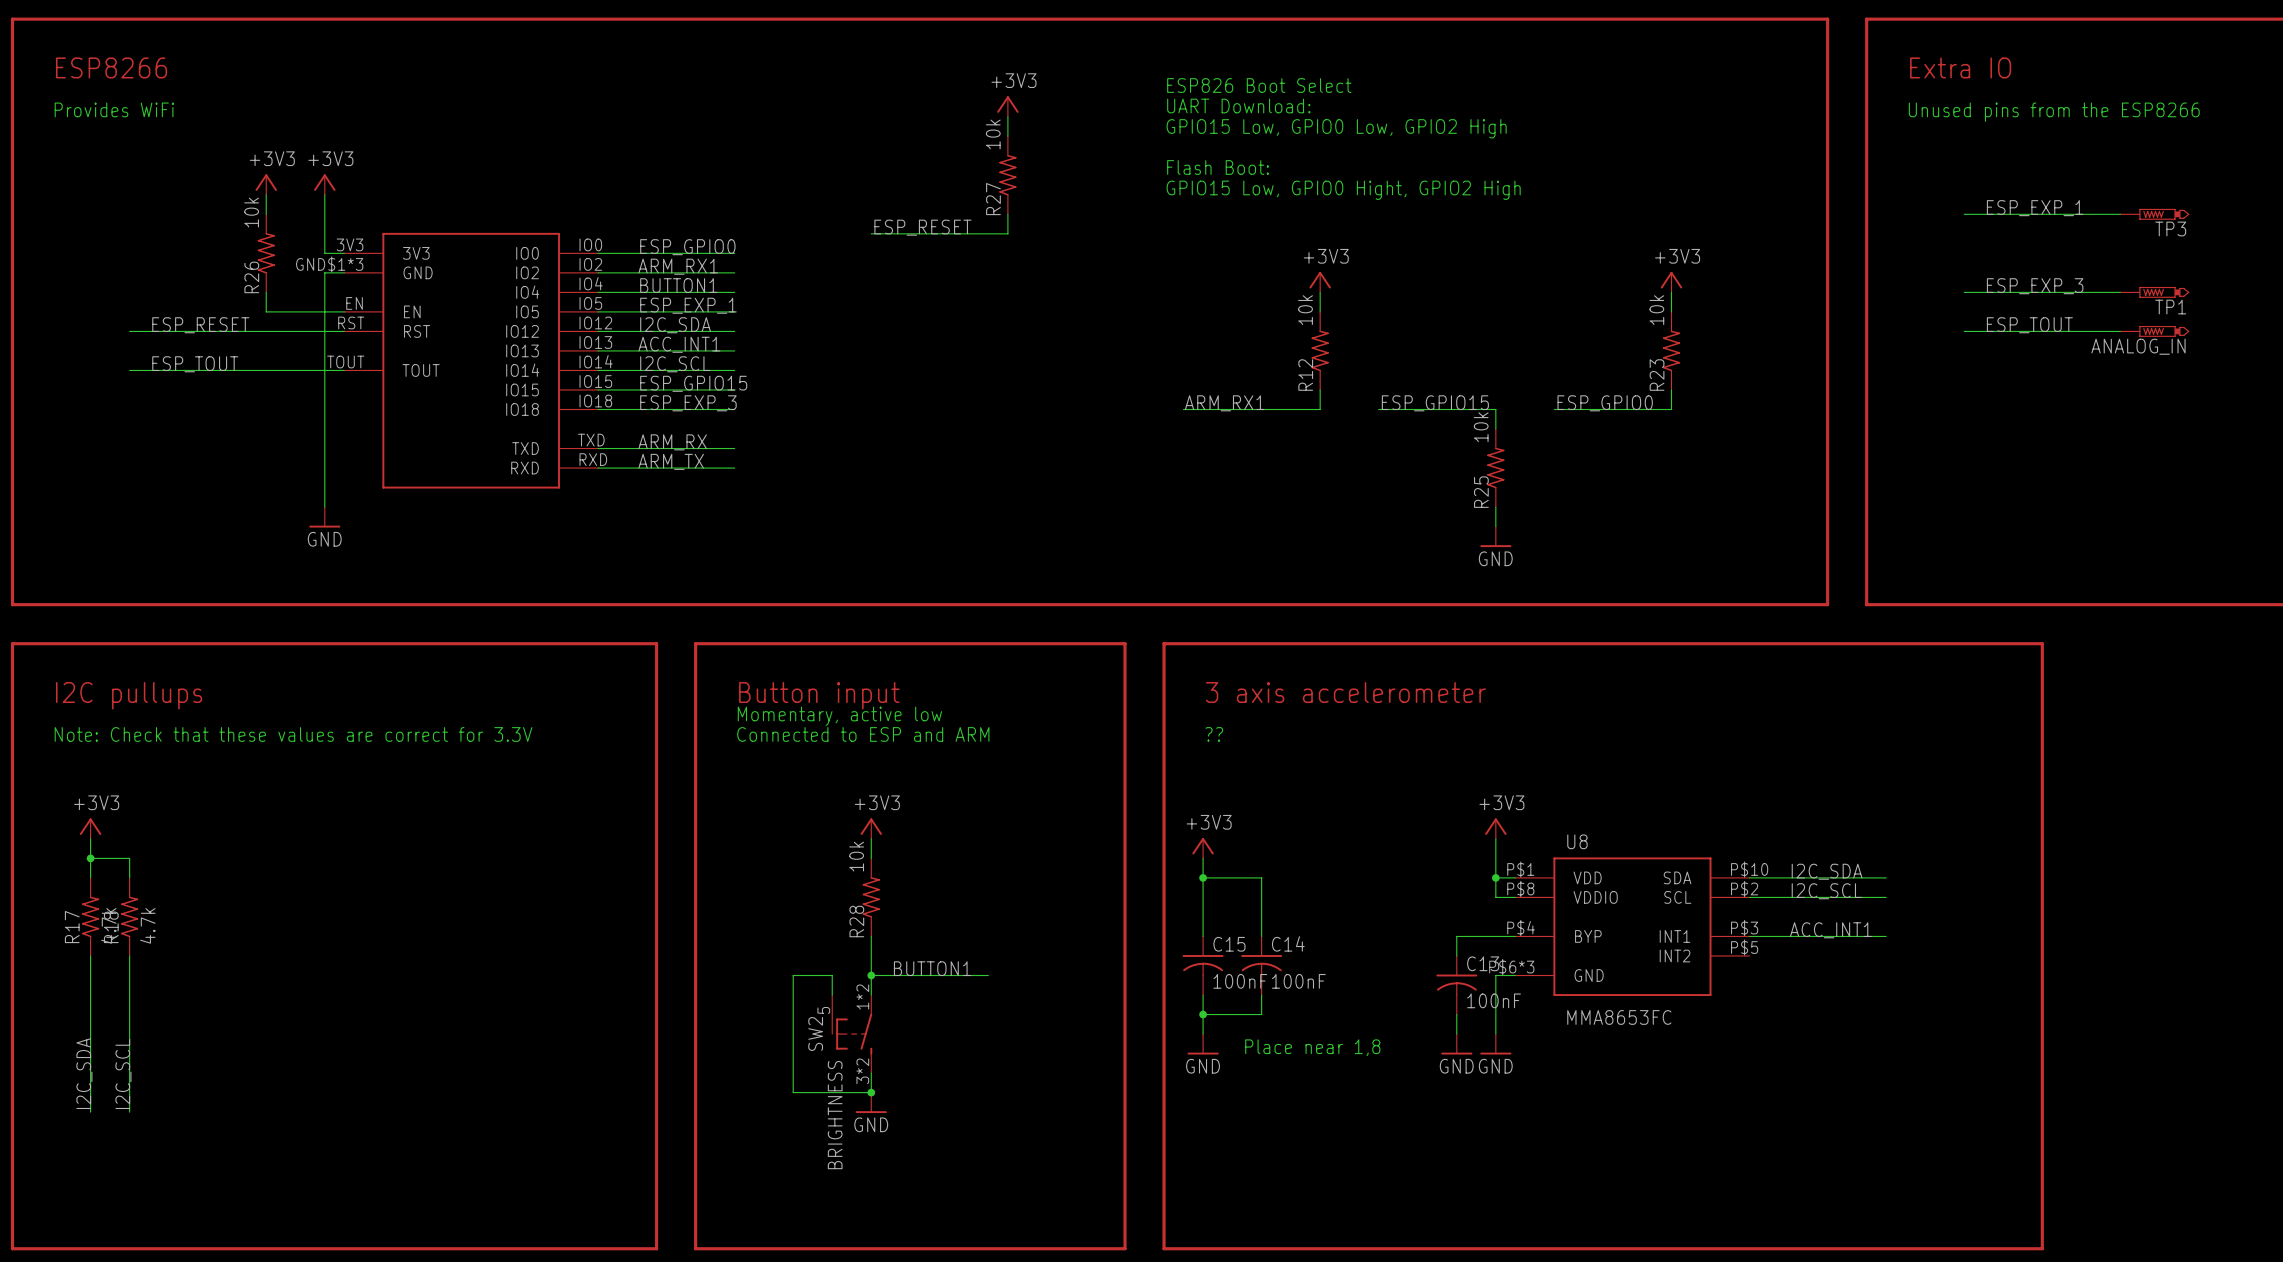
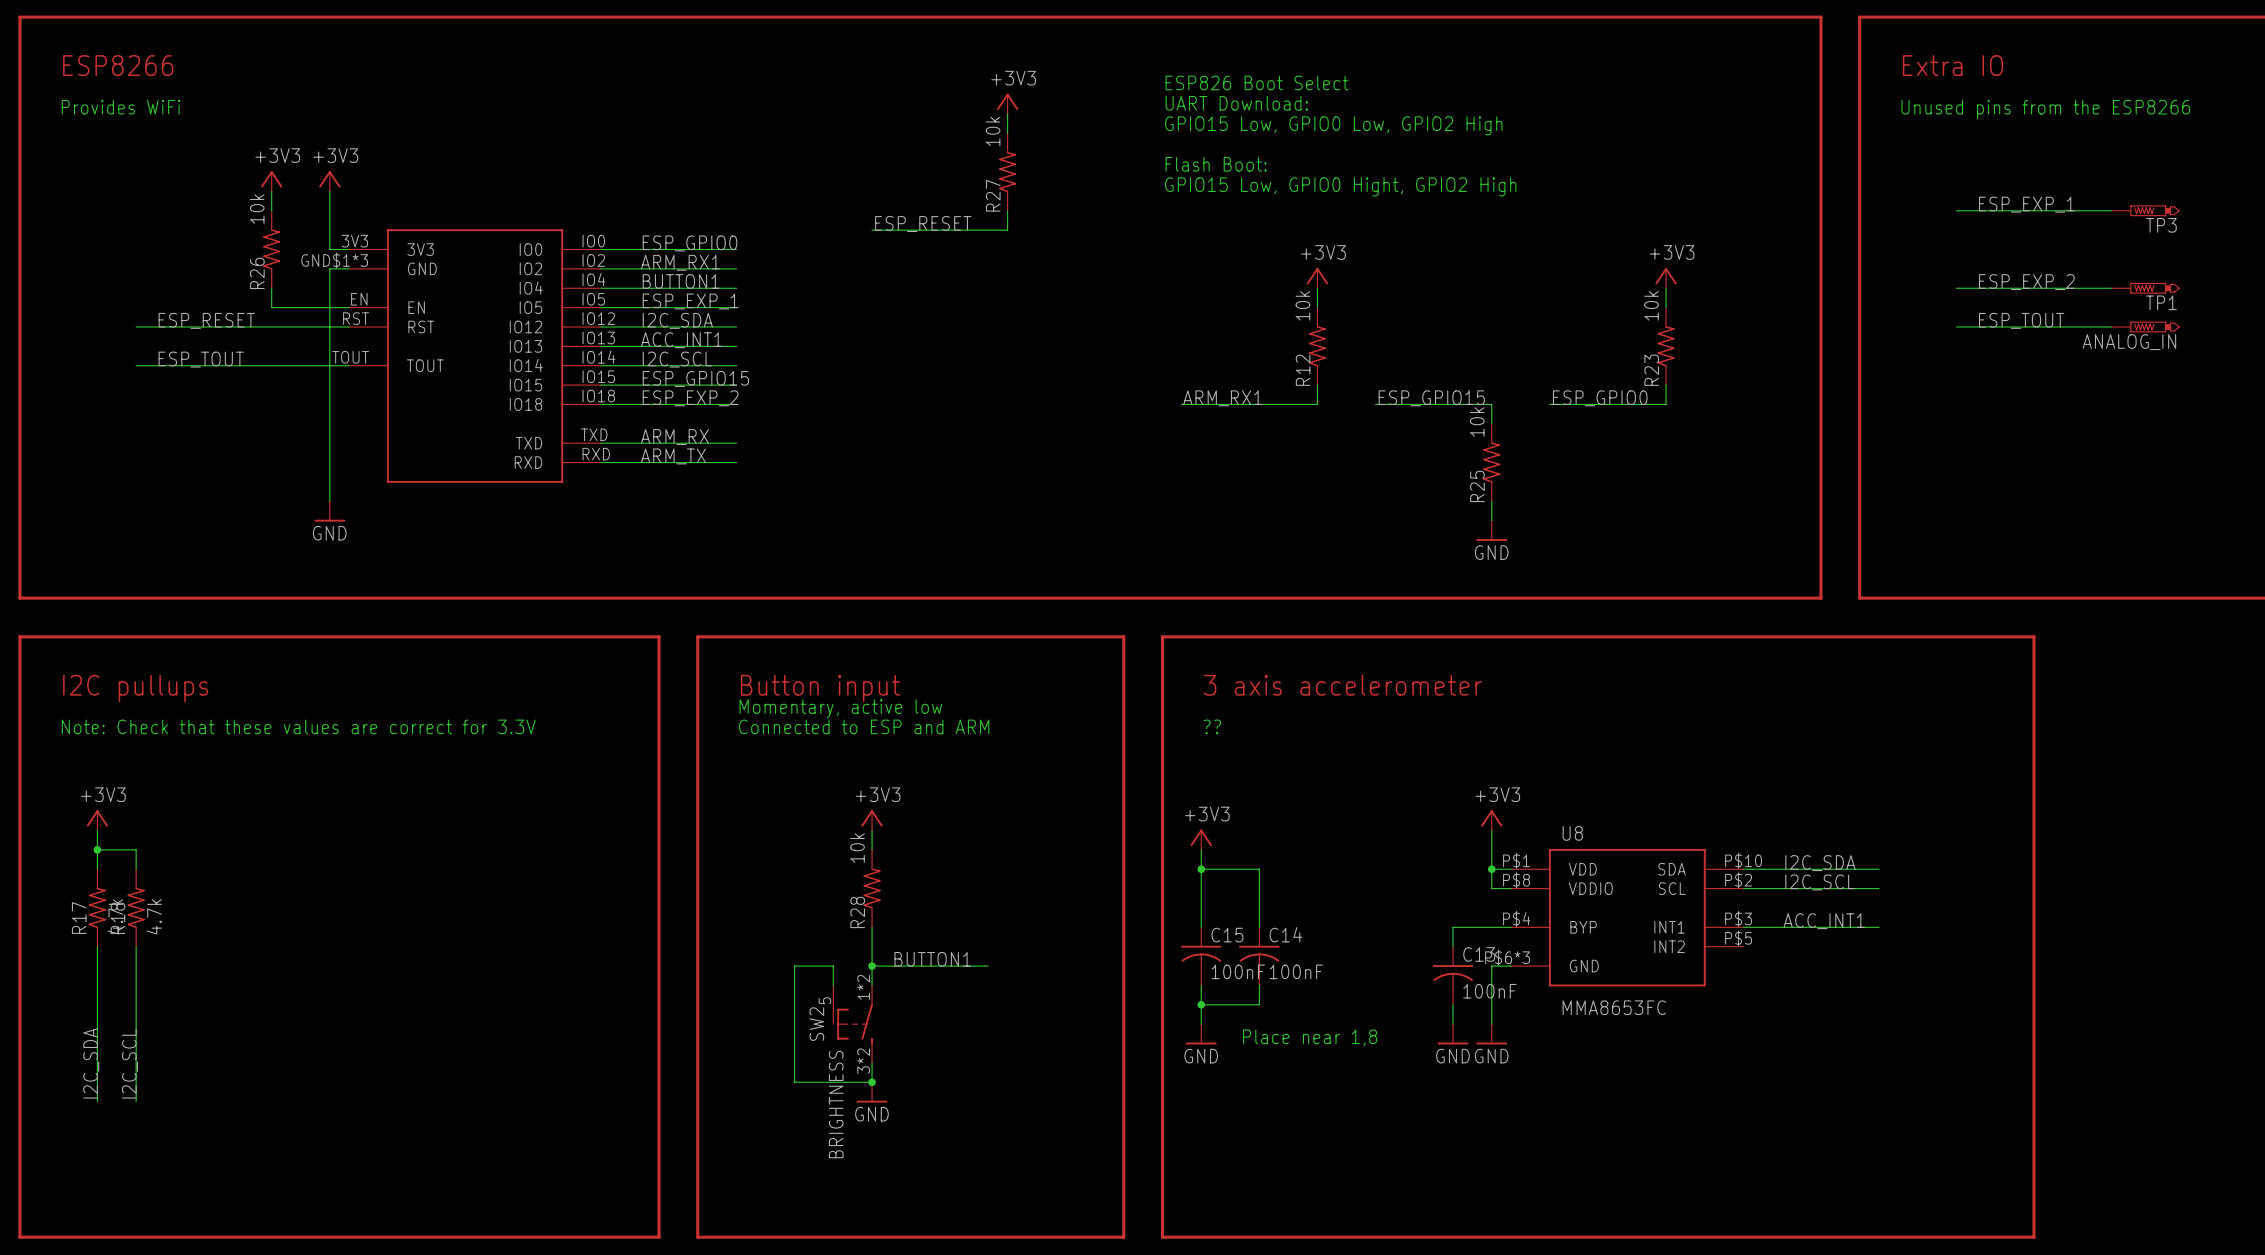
label: ESP_EXP_3 (2035, 286) -> ESP_EXP_2 (2026, 282)
label: ESP_EXP_3 (688, 403) -> ESP_EXP_2 (690, 398)

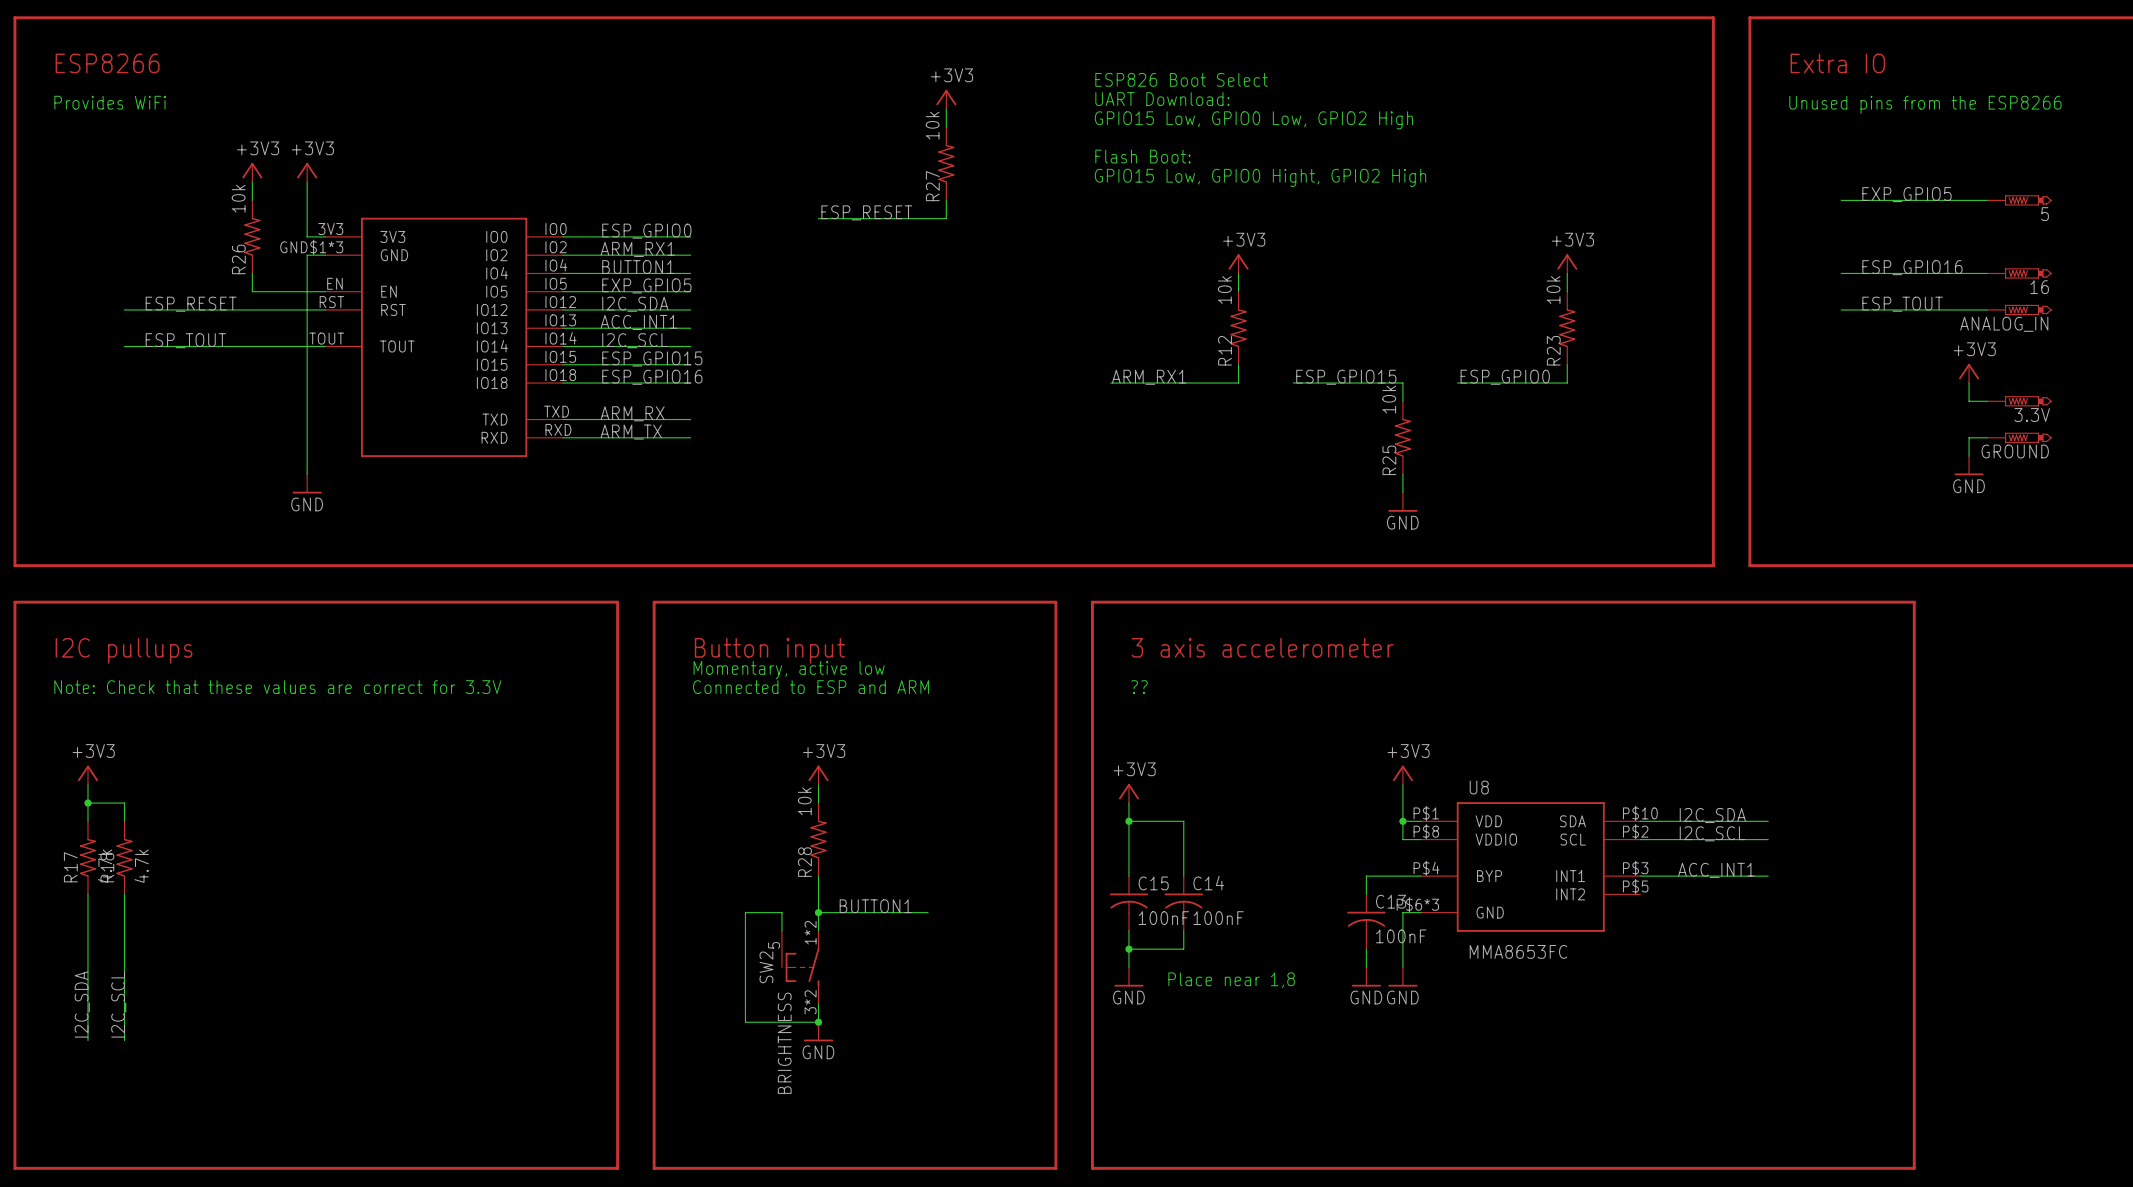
label: ESP_EXP_1 (2026, 204) -> EXP_GPIO5 (1906, 194)
TP3 name: TP3 (2161, 225) -> 5 (2045, 214)
label: ESP_EXP_2 (2026, 282) -> ESP_GPIO16 (1912, 267)
label: ESP_EXP_1 (690, 301) -> EXP_GPIO5 (646, 285)
TP1 name: TP1 (2161, 302) -> 16 (2039, 287)
power symbol: none -> +3V3 (1969, 373)
label: ESP_EXP_2 (690, 398) -> ESP_GPIO16 (652, 377)
wire: none -> (1969, 383) (1969, 401) (1987, 401)
3.3V: none -> (2019, 401)
wire: none -> (1987, 437) (1969, 437) (1969, 456)
GROUND: none -> (2019, 437)
power symbol: none -> GND (1969, 465)

